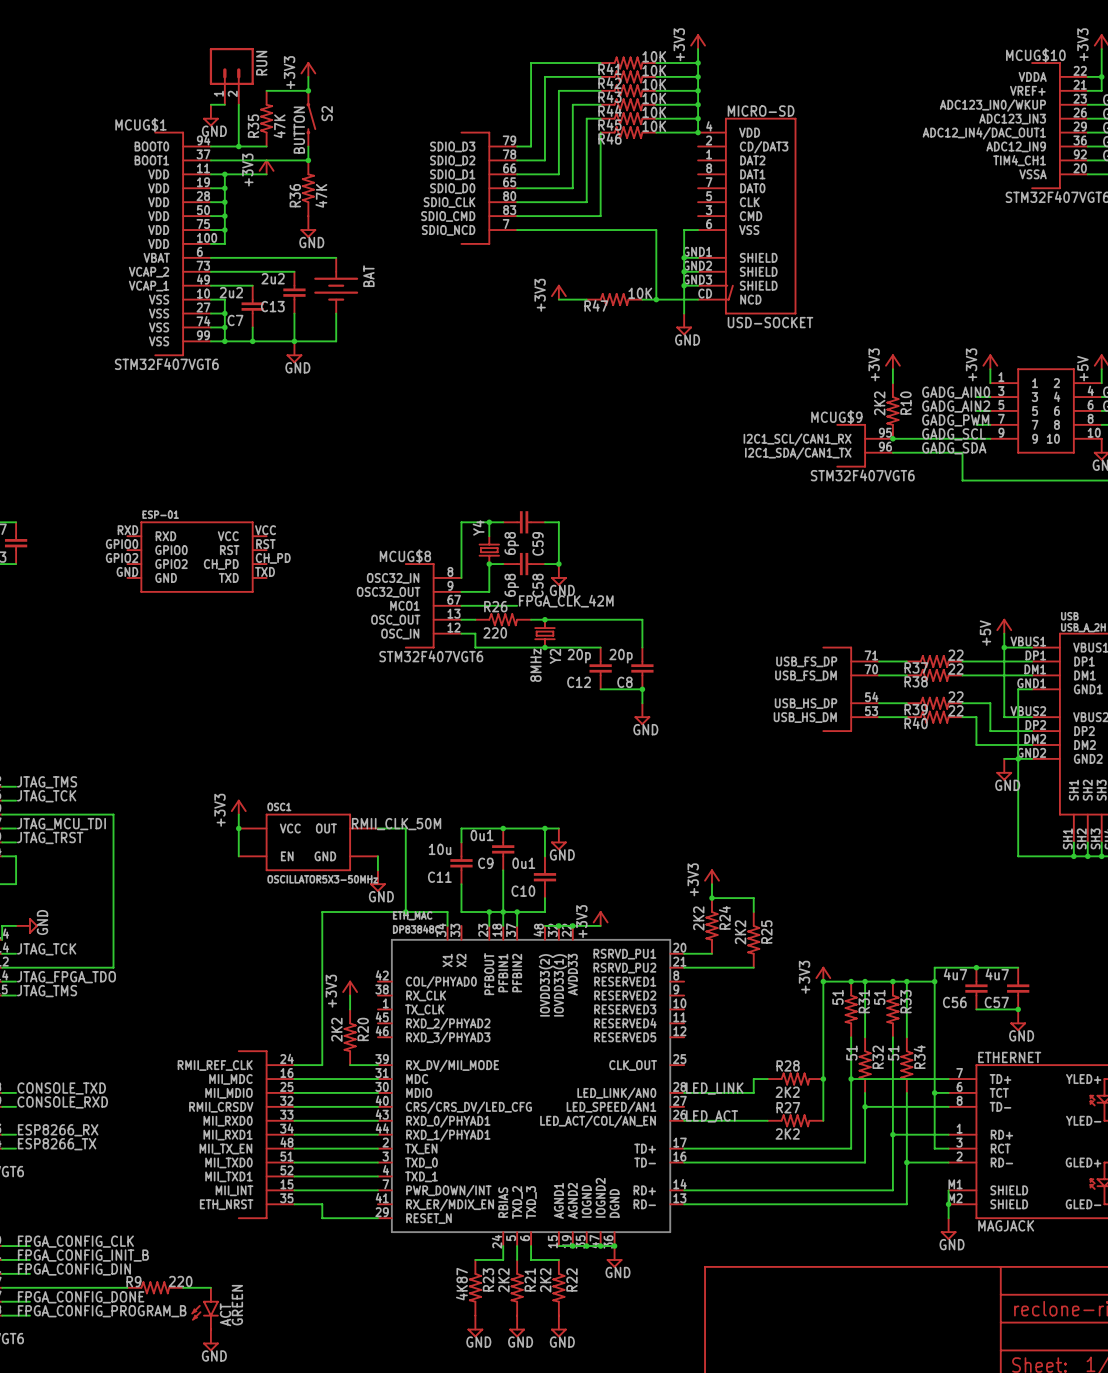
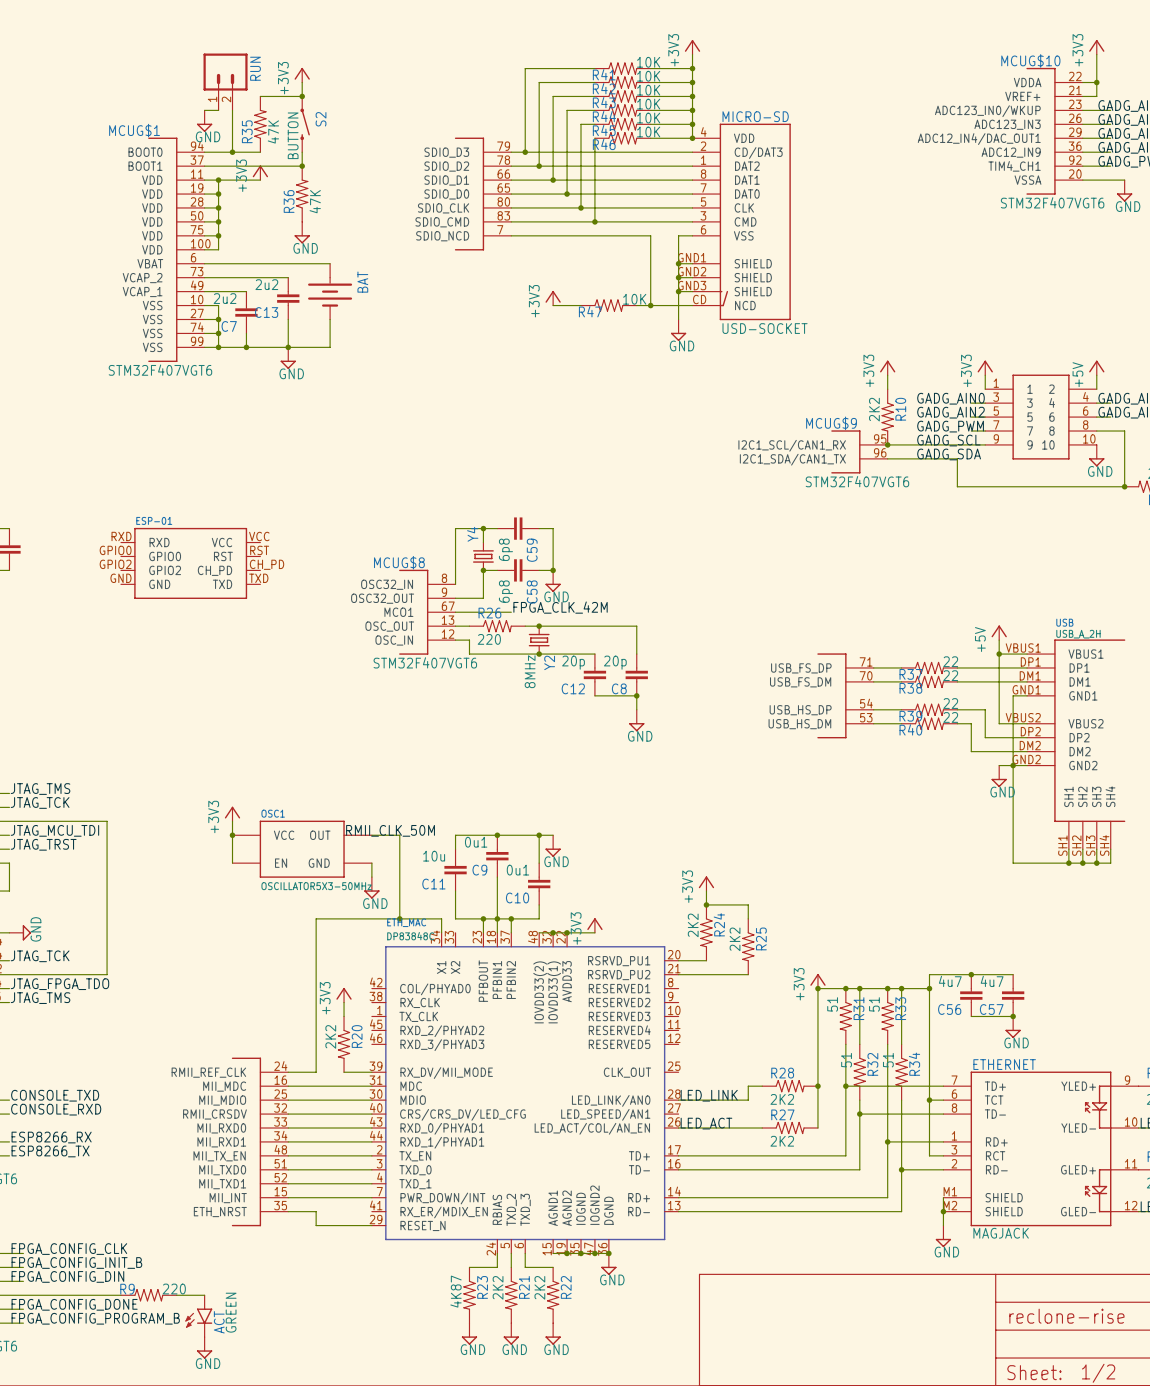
wire: none -> (525, 152) (692, 152)
junction: none -> (525, 152)
wire: none -> (539, 166) (692, 166)
junction: none -> (539, 166)
wire: none -> (553, 180) (692, 180)
junction: none -> (553, 180)
wire: none -> (567, 194) (692, 194)
junction: none -> (567, 194)
wire: none -> (581, 207) (692, 207)
junction: none -> (581, 207)
wire: none -> (594, 221) (692, 221)
junction: none -> (594, 221)

